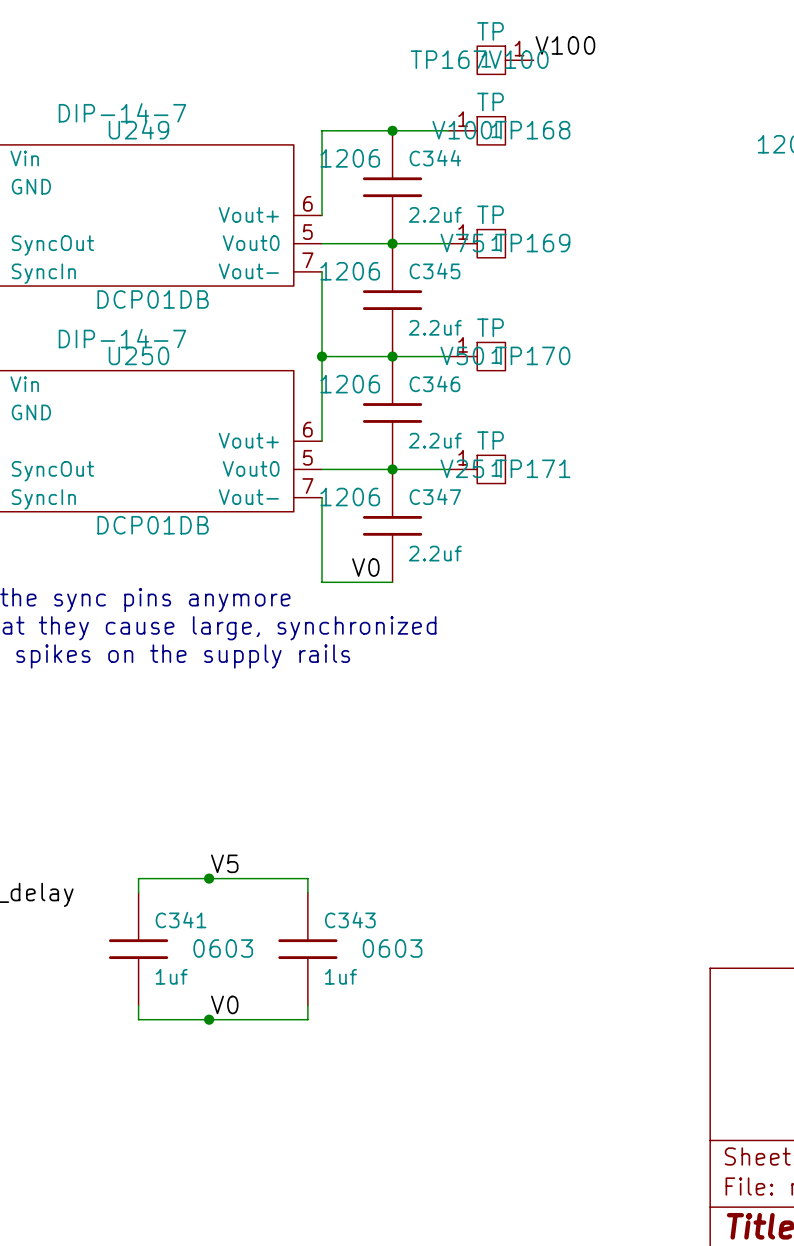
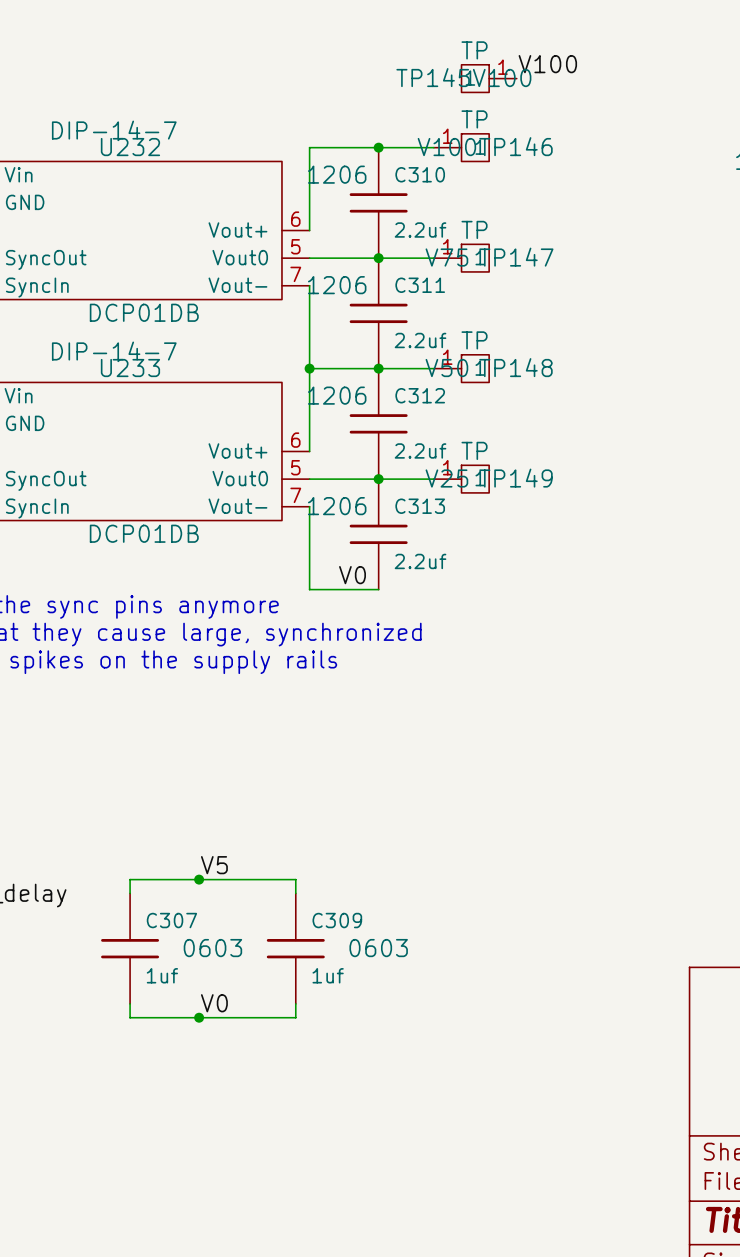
TP167 name: TP167 (448, 59) -> TP145 (433, 77)
U249 name: U249 (138, 129) -> U232 (130, 147)
TP168 name: TP168 (532, 130) -> TP146 (515, 146)
C344 name: C344 (435, 158) -> C310 (420, 174)
TP169 name: TP169 (532, 243) -> TP147 (516, 257)
C345 name: C345 (434, 271) -> C311 (420, 285)
U250 name: U250 (138, 355) -> U233 (130, 368)
TP170 name: TP170 (532, 355) -> TP148 (515, 367)
C346 name: C346 (434, 383) -> C312 (420, 395)
TP171 name: TP171 (532, 468) -> TP149 (515, 478)
C347 name: C347 (435, 496) -> C313 (420, 506)
C341 name: C341 (181, 920) -> C307 (171, 920)
C343 name: C343 (350, 920) -> C309 (337, 920)

